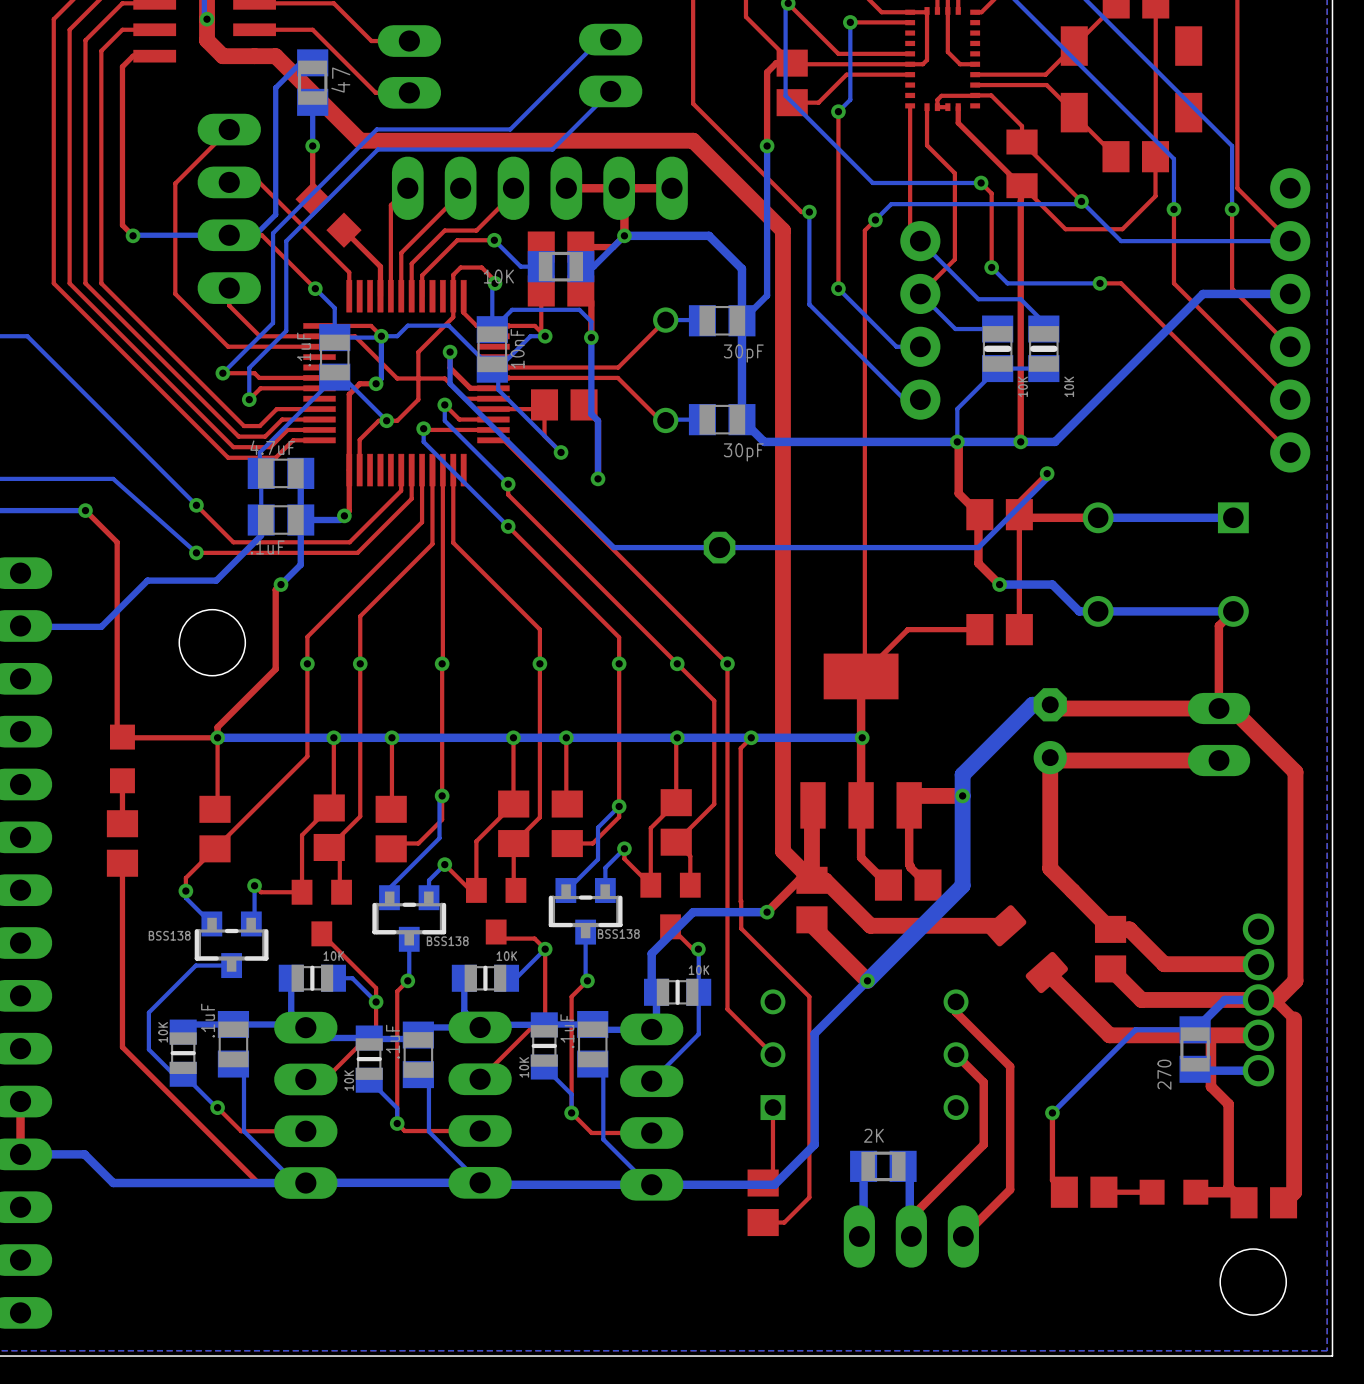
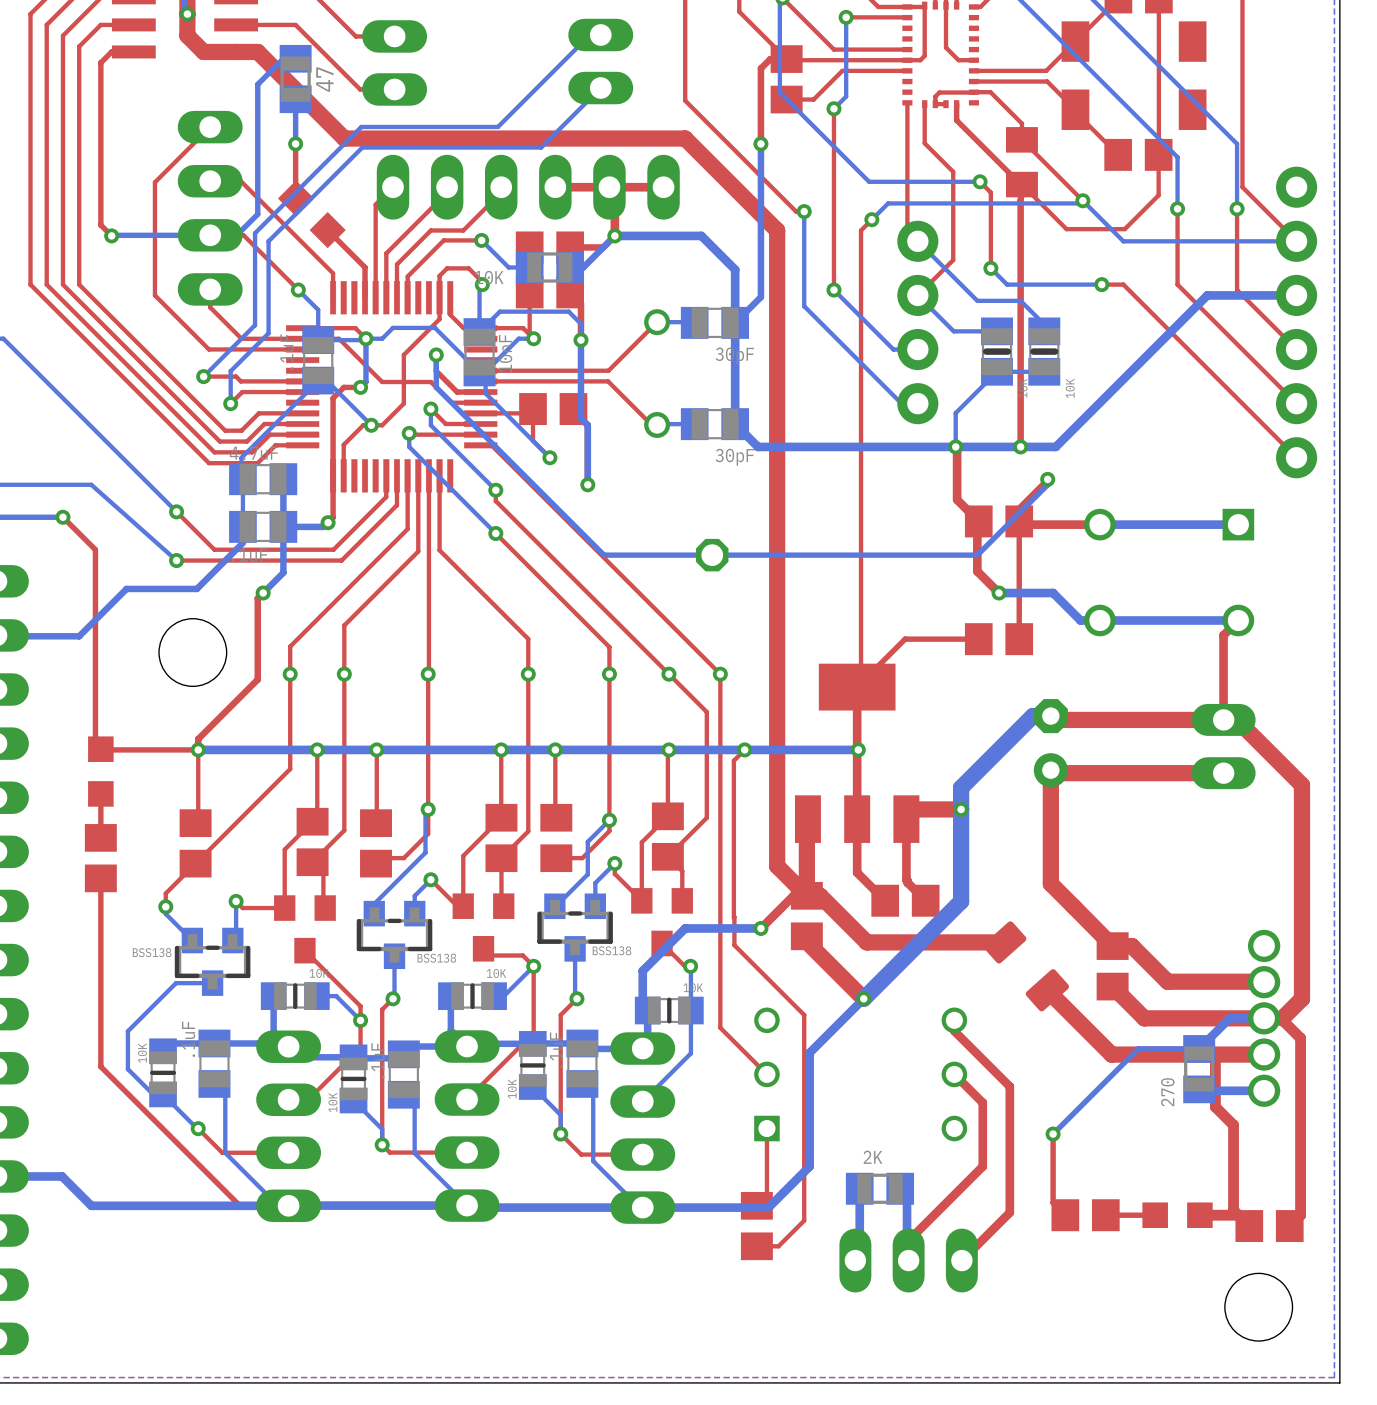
top track width: thick (1294, 1019) (1294, 1192) (1283, 1202) -> thin (1300, 1038) (1300, 1215) (1289, 1226)

